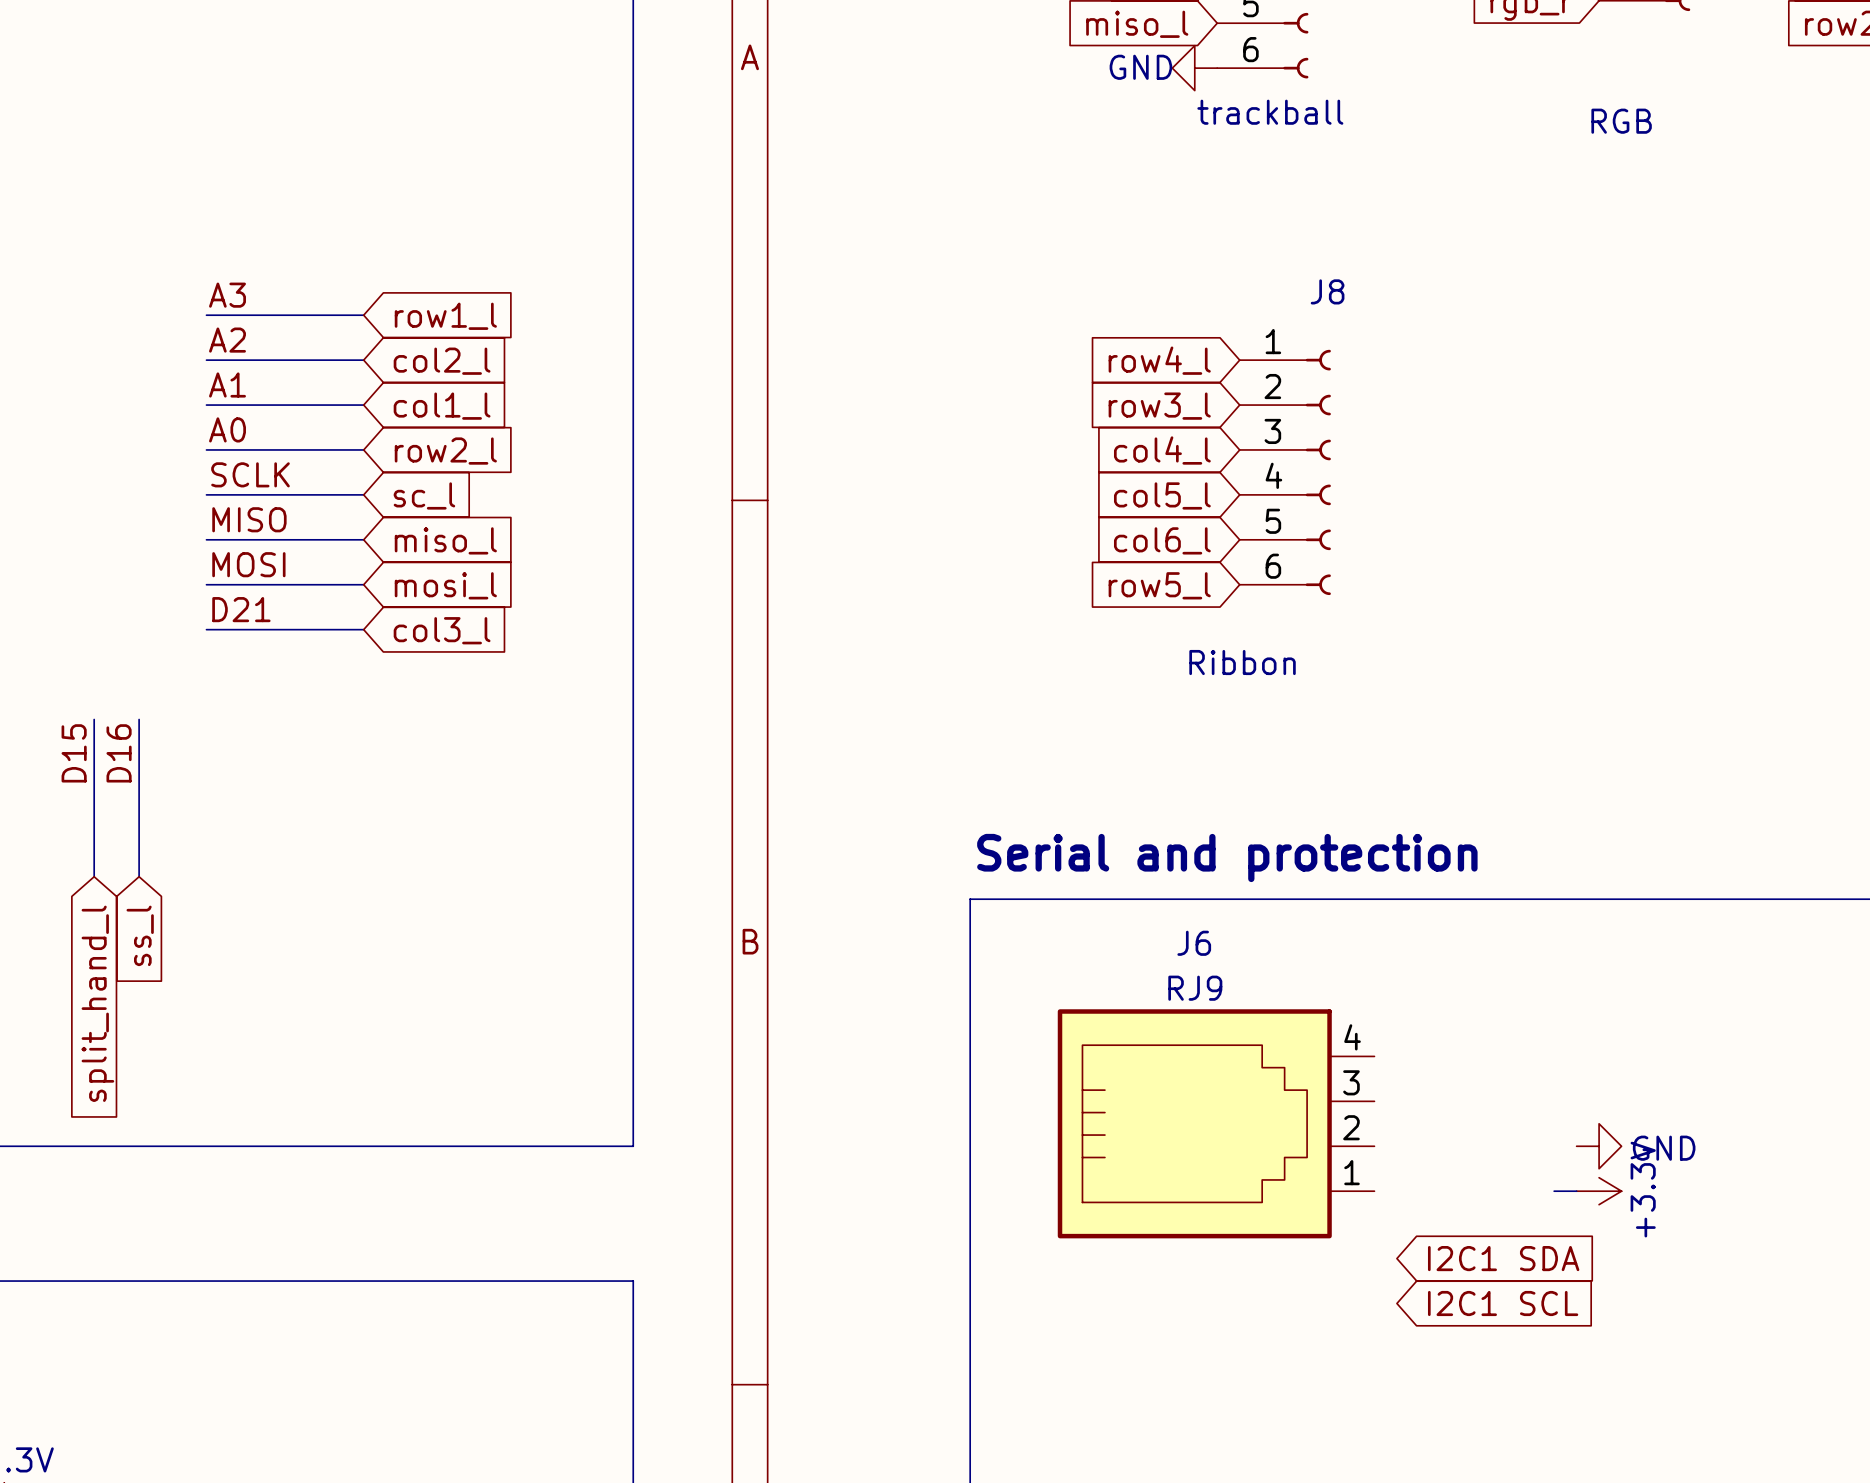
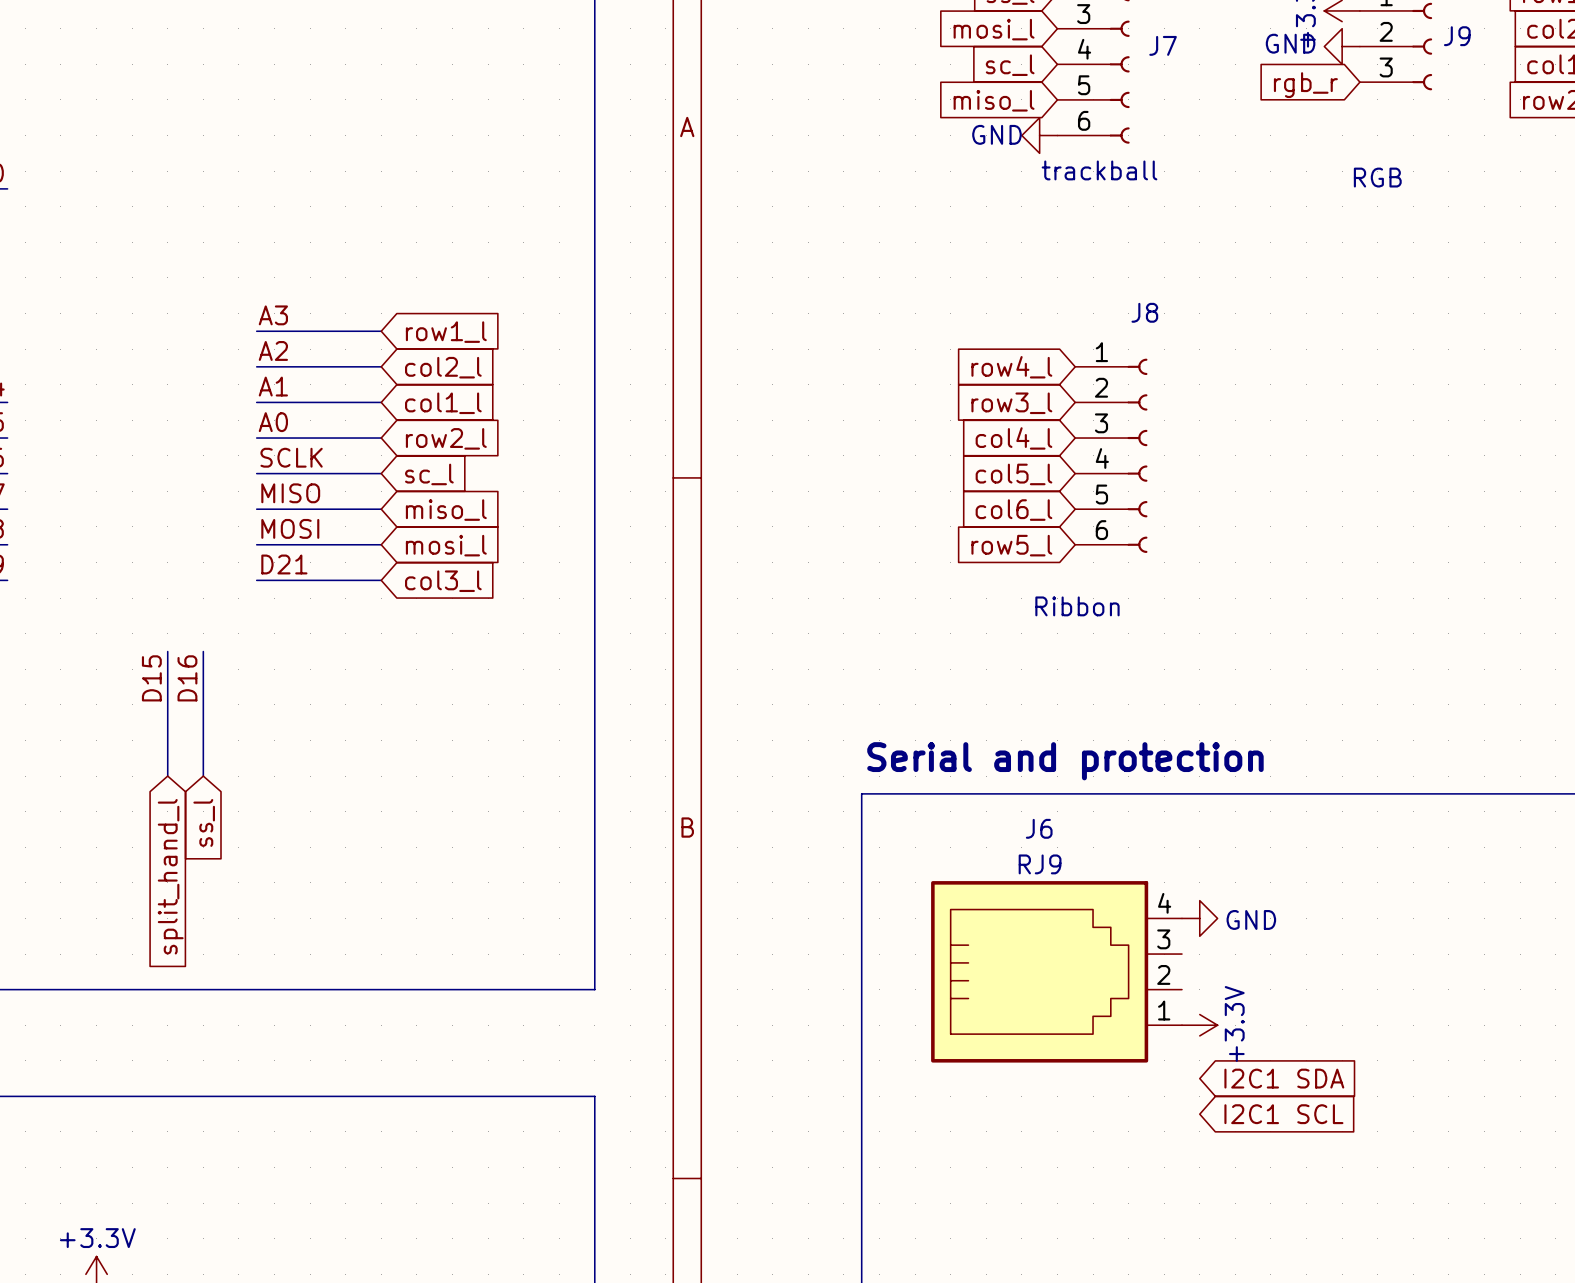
power symbol position: GND (1599, 1146) -> GND (1199, 918)
wire: (1554, 1191) (1576, 1191) -> none
power symbol position: +3.3V (1599, 1191) -> +3.3V (1199, 1025)

